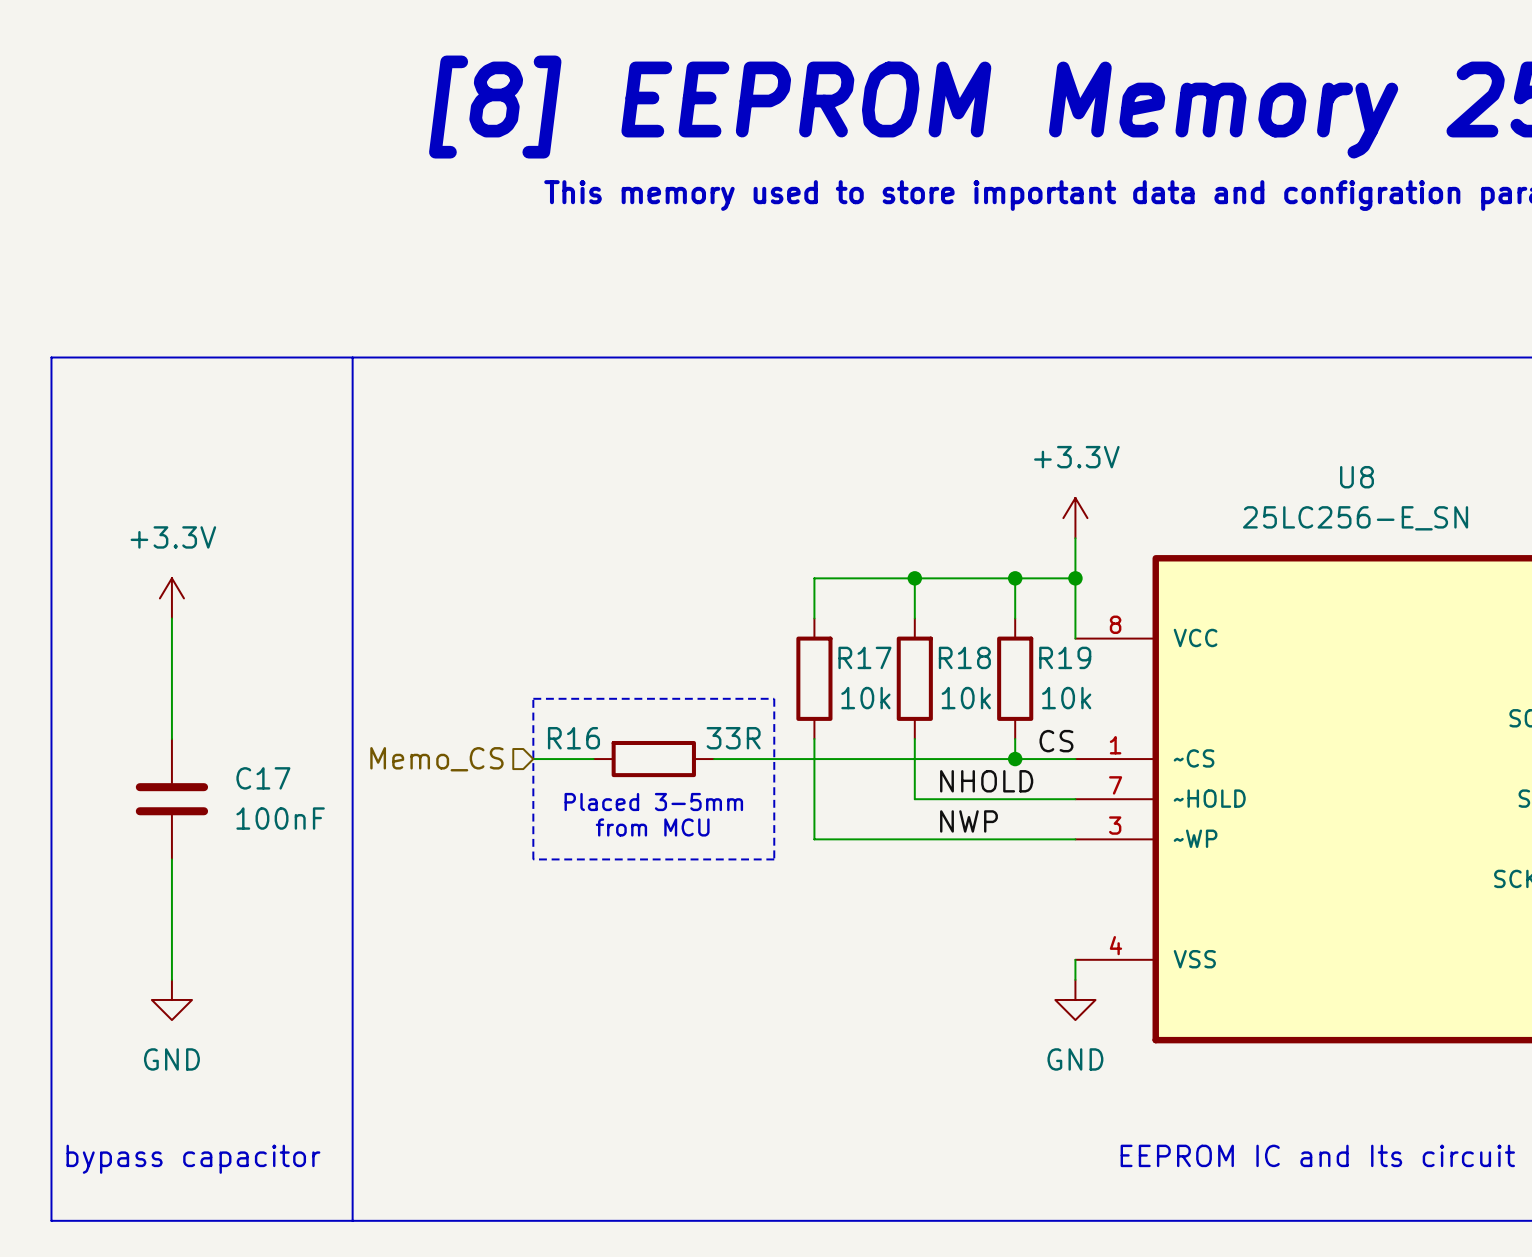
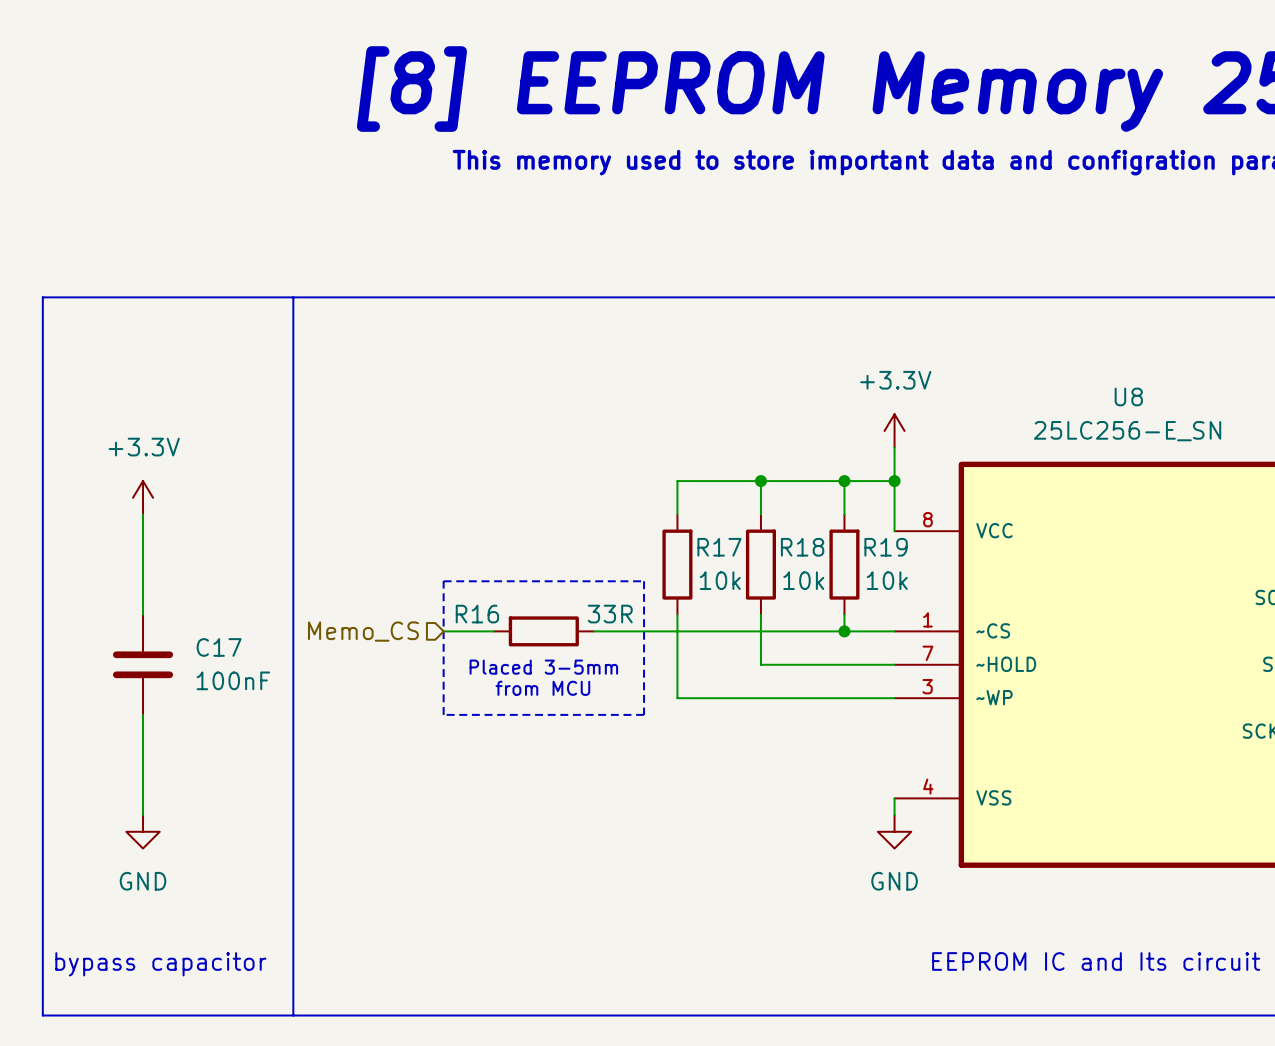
label: CS (1056, 741) -> none
label: NHOLD (986, 781) -> none
label: NWP (968, 821) -> none

